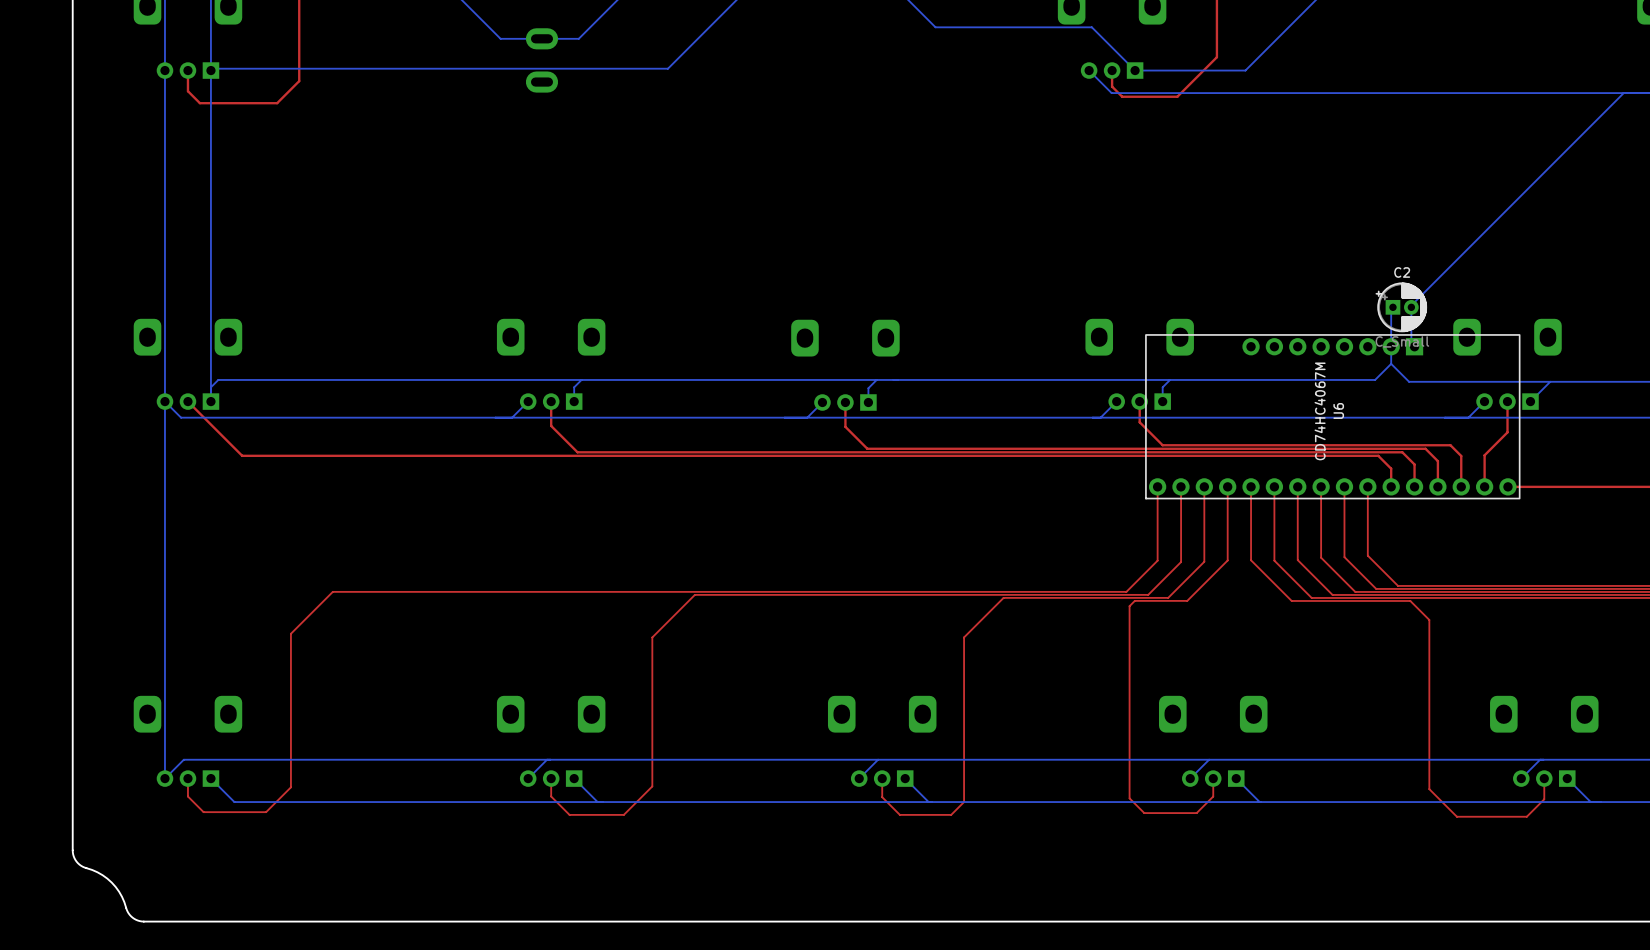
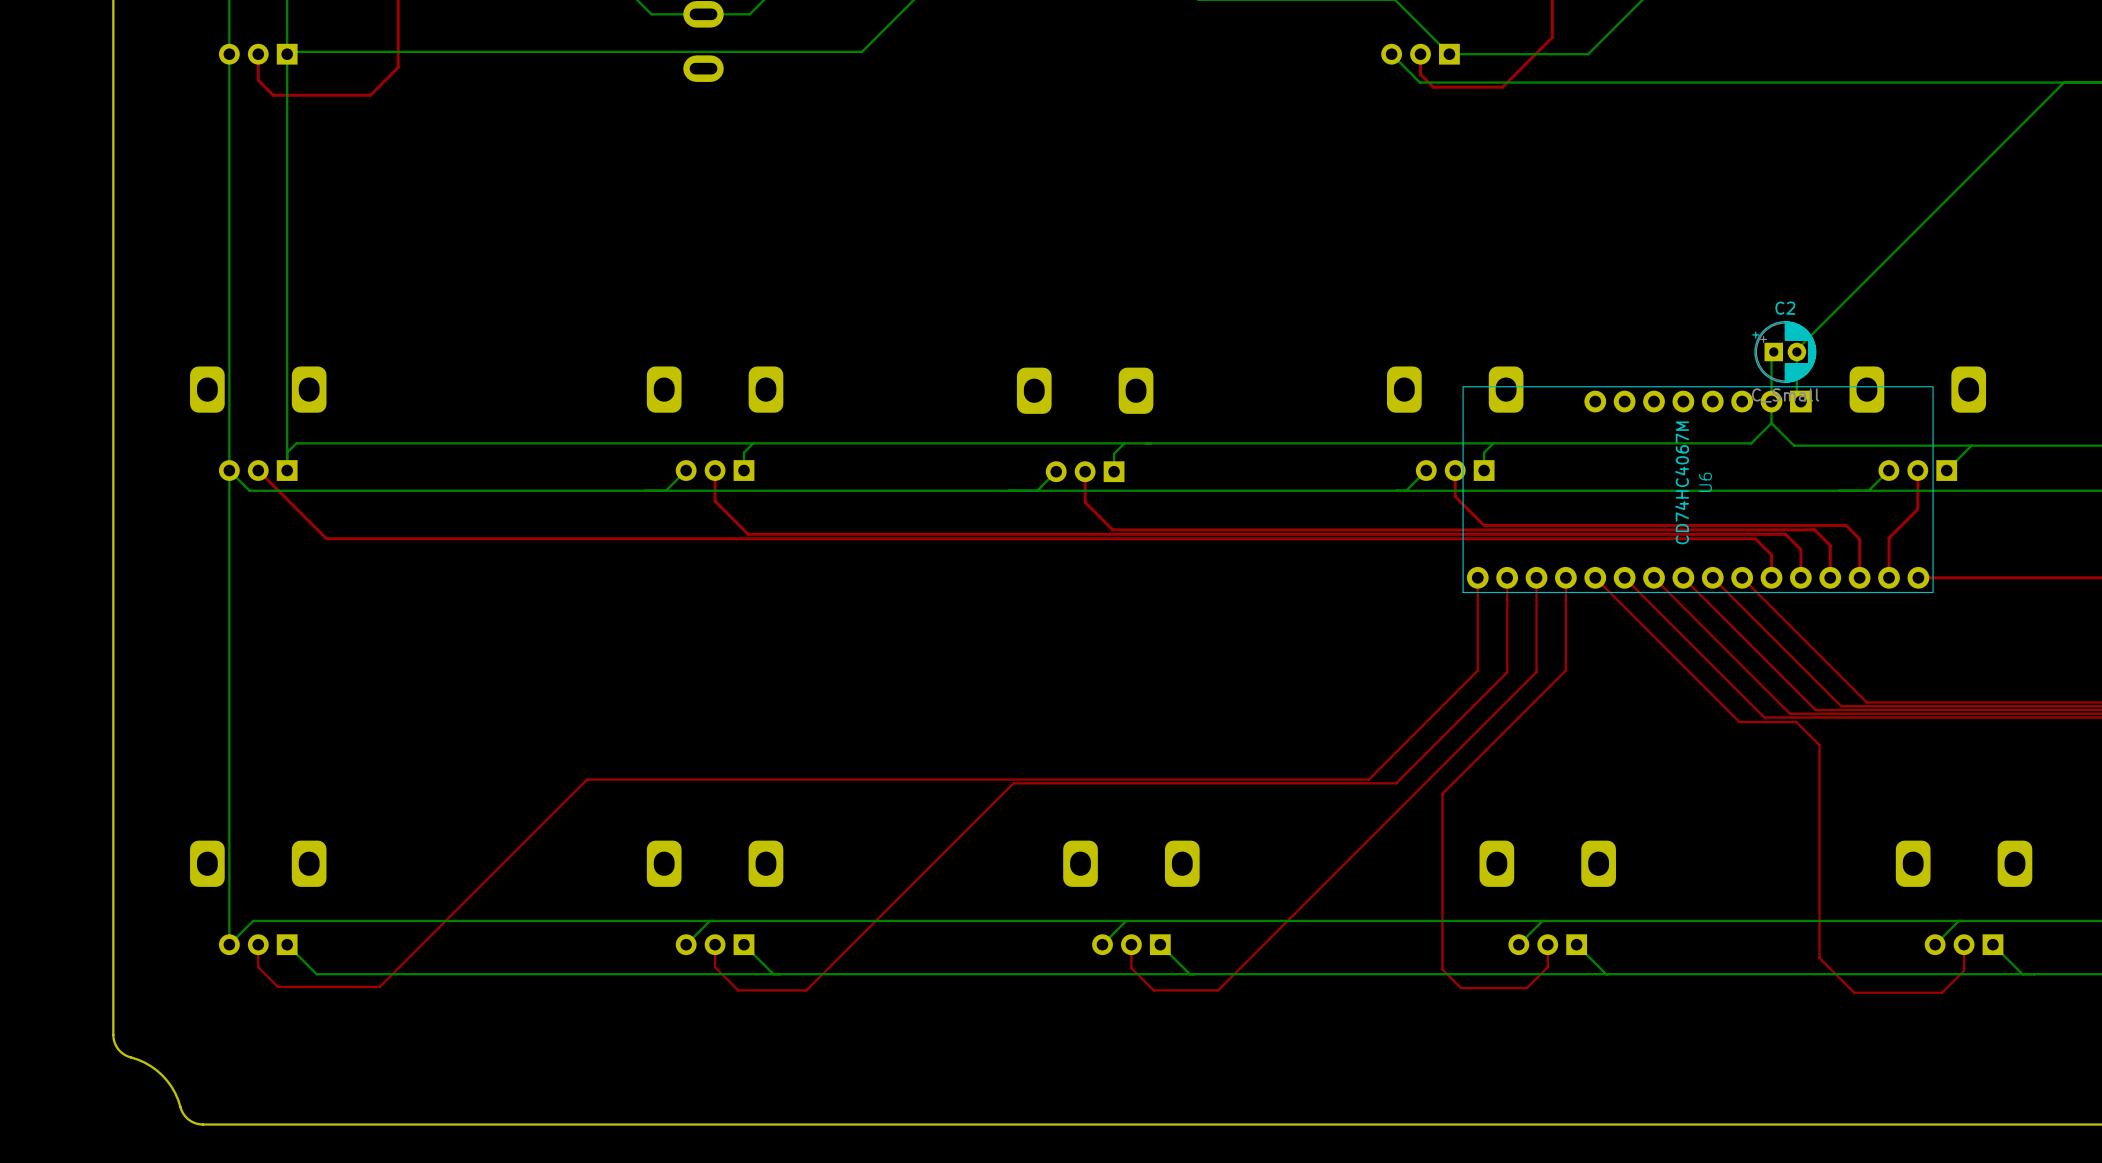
top track: (1251, 486) (1251, 560) (1291, 600) (1410, 601) -> (1595, 577) (1739, 722) (1796, 722)
top track: (1274, 486) (1274, 560) (1311, 597) (1385, 597) -> (1624, 577) (1764, 717)
top track: (1297, 486) (1297, 560) (1332, 594) (1405, 594) -> (1654, 577) (1789, 713)
top track: (1321, 486) (1321, 557) (1355, 591) (1426, 591) -> (1683, 577) (1815, 709)
top track: (1344, 486) (1344, 557) (1376, 588) (1446, 588) -> (1712, 577) (1841, 706)
top track: (1367, 486) (1367, 555) (1398, 585) (1466, 585) -> (1742, 577) (1866, 702)
top track: (1126, 591) (332, 591) (290, 633) (290, 787) (266, 812) -> (1438, 709) (1368, 779) (587, 779) (379, 986) (356, 986)
top track: (1148, 594) (694, 594) (652, 637) (652, 786) -> (1465, 713) (1396, 783) (1013, 783) (842, 954)
top track: (1168, 597) (1003, 597) (964, 637) (964, 802) -> (1491, 717) (1234, 974)
top track: (1187, 600) (1134, 600) (1129, 606) (1129, 658) -> (1515, 721) (1442, 793)

